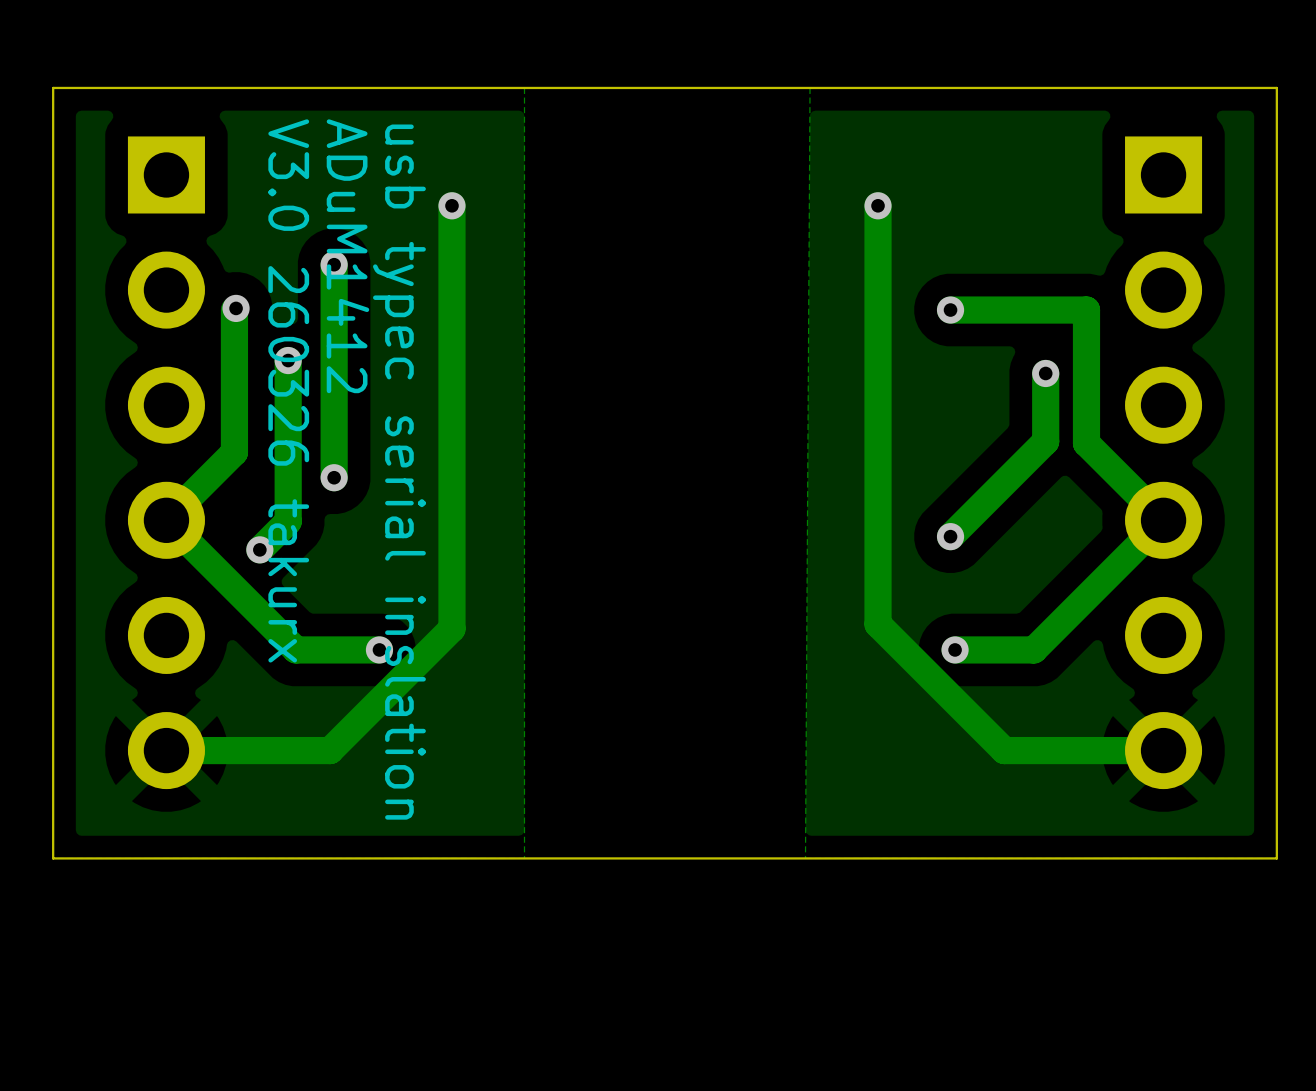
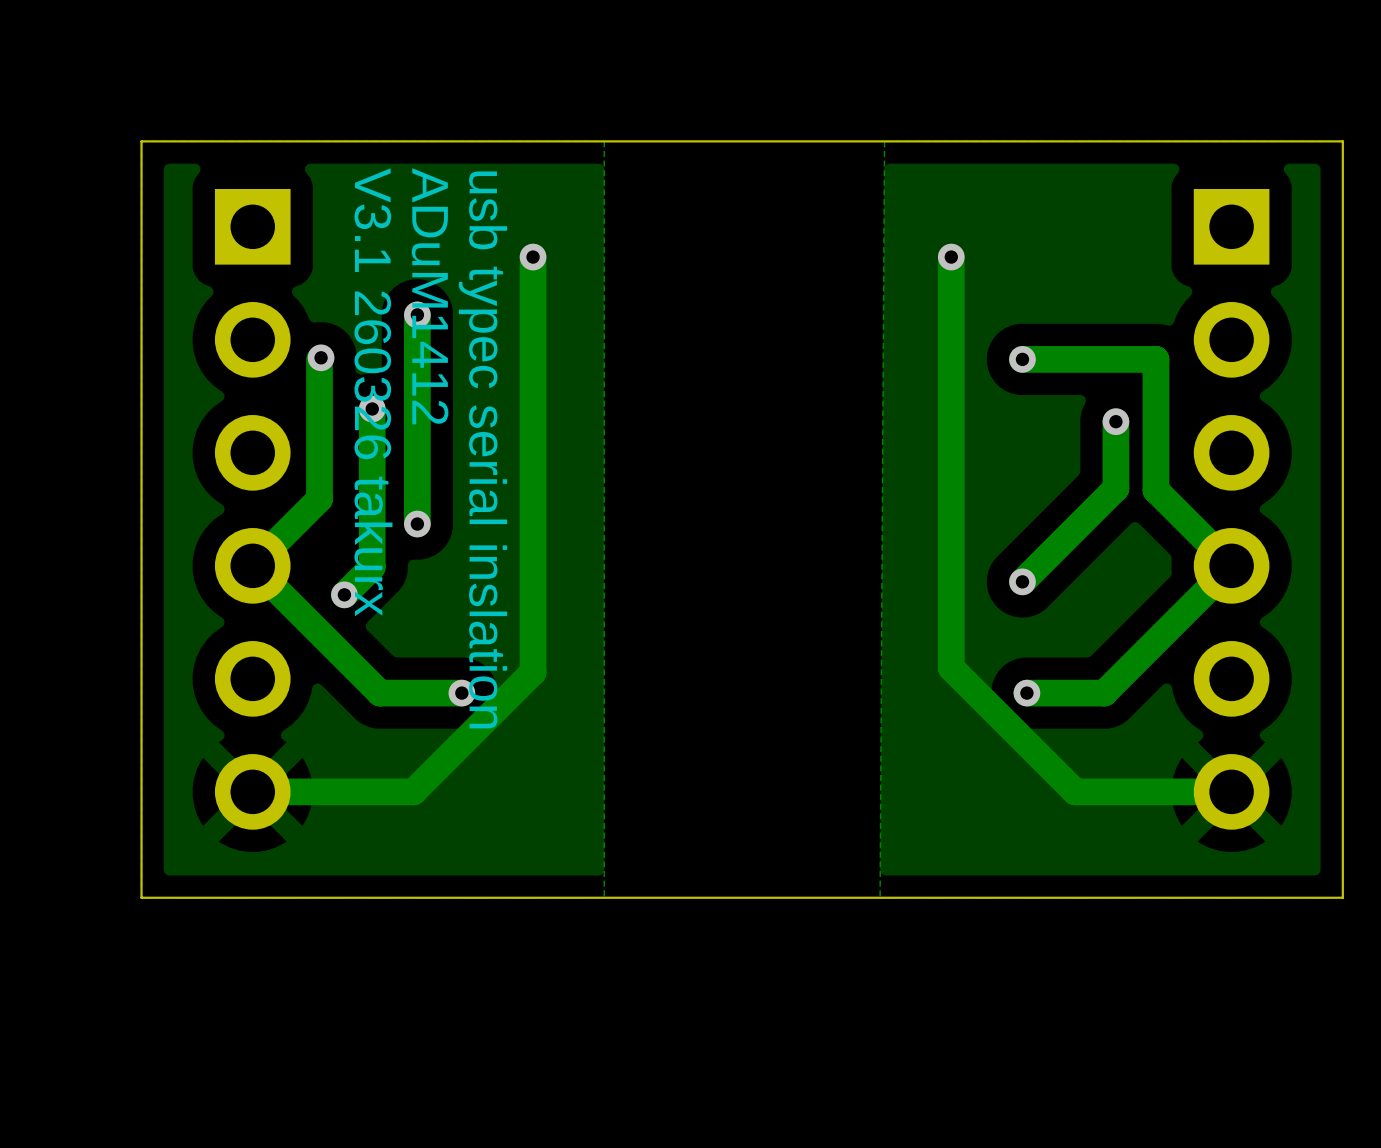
text: V3.0 260326 takurx (288, 390) -> V3.1 260326 takurx (373, 392)

